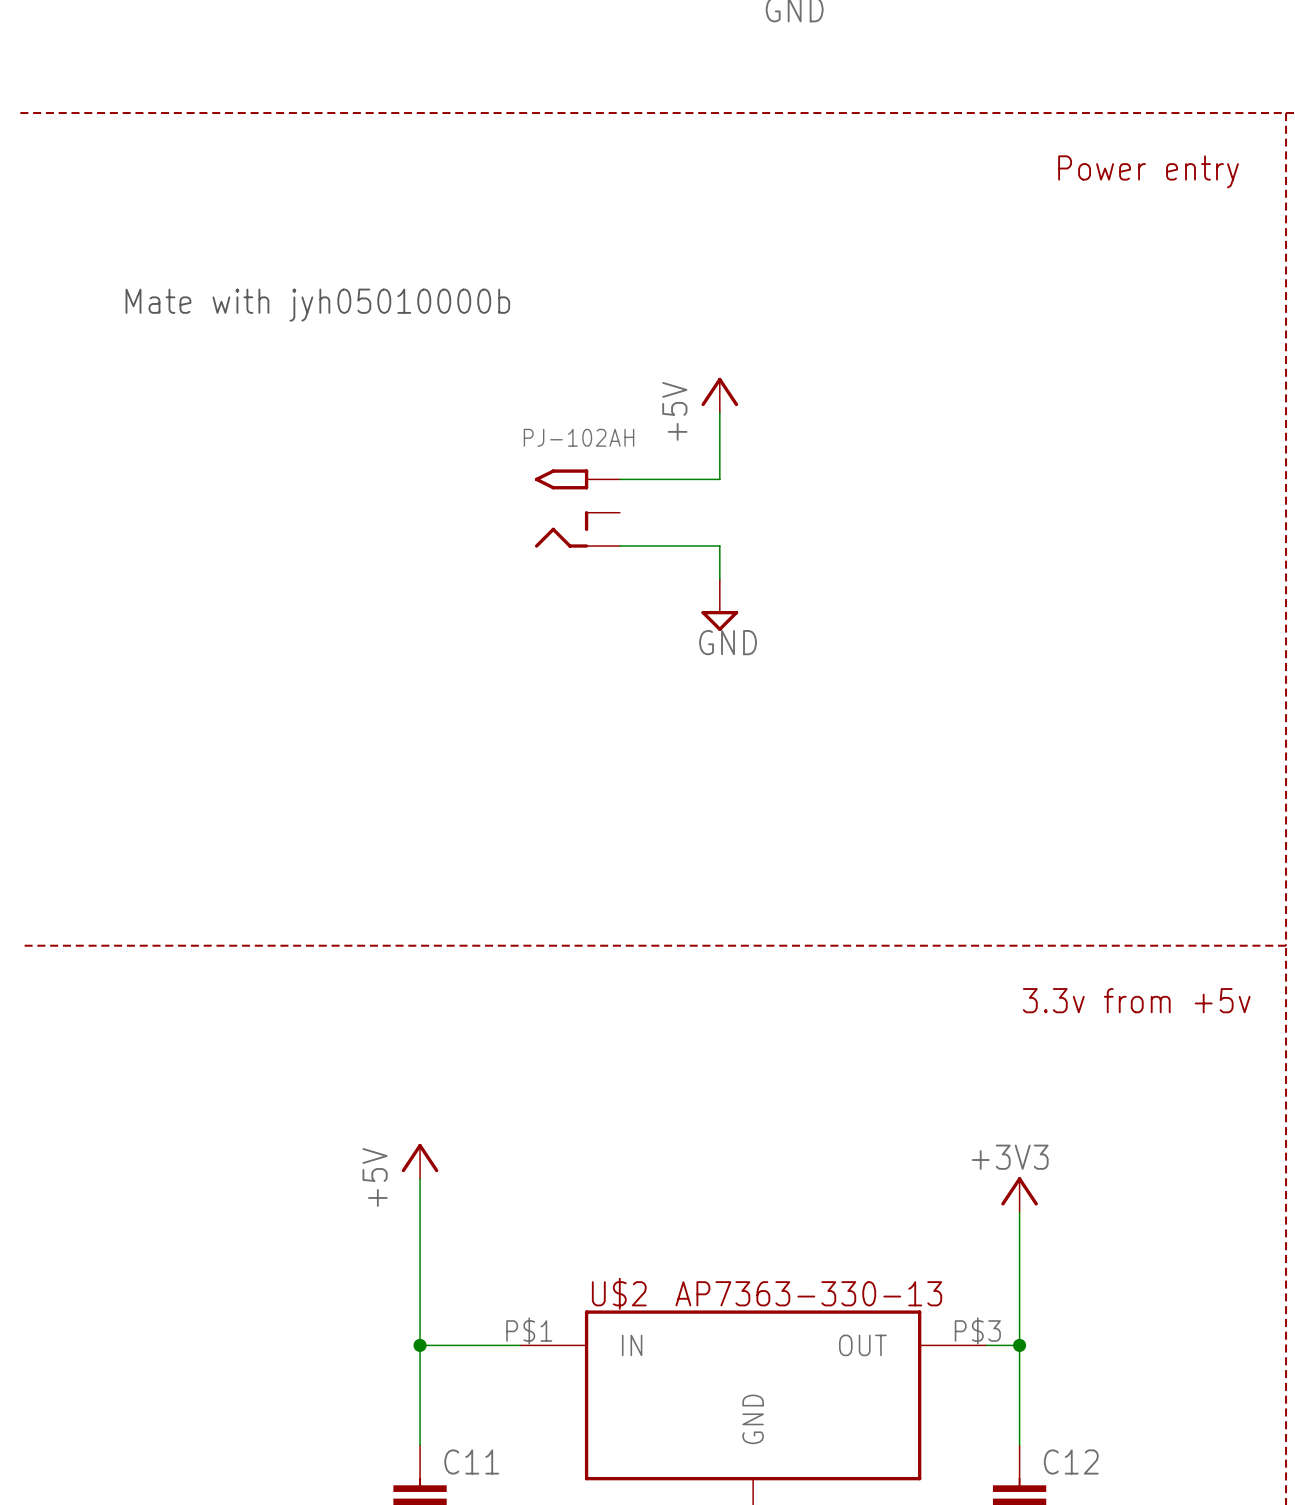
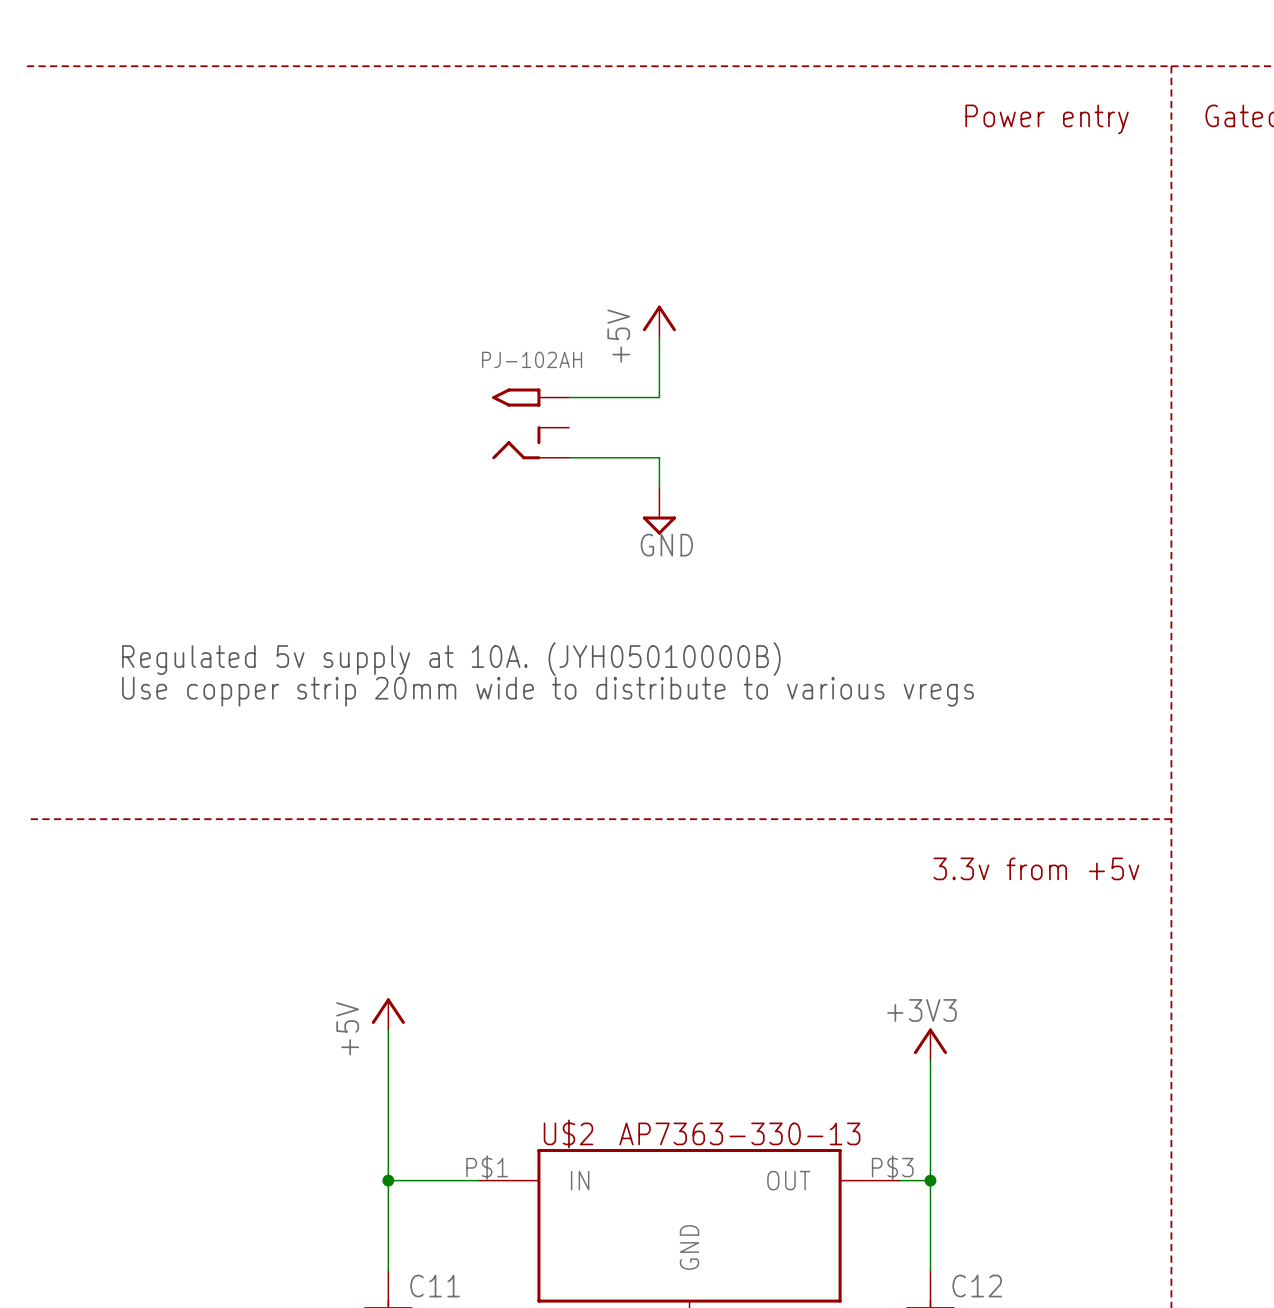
text: Mate with jyh05010000b (317, 305) -> none
text: none -> Regulated 5v supply at 10A. (JYH05010000B) (451, 659)
text: none -> Use copper strip 20mm wide to distribute to various vregs (548, 691)

